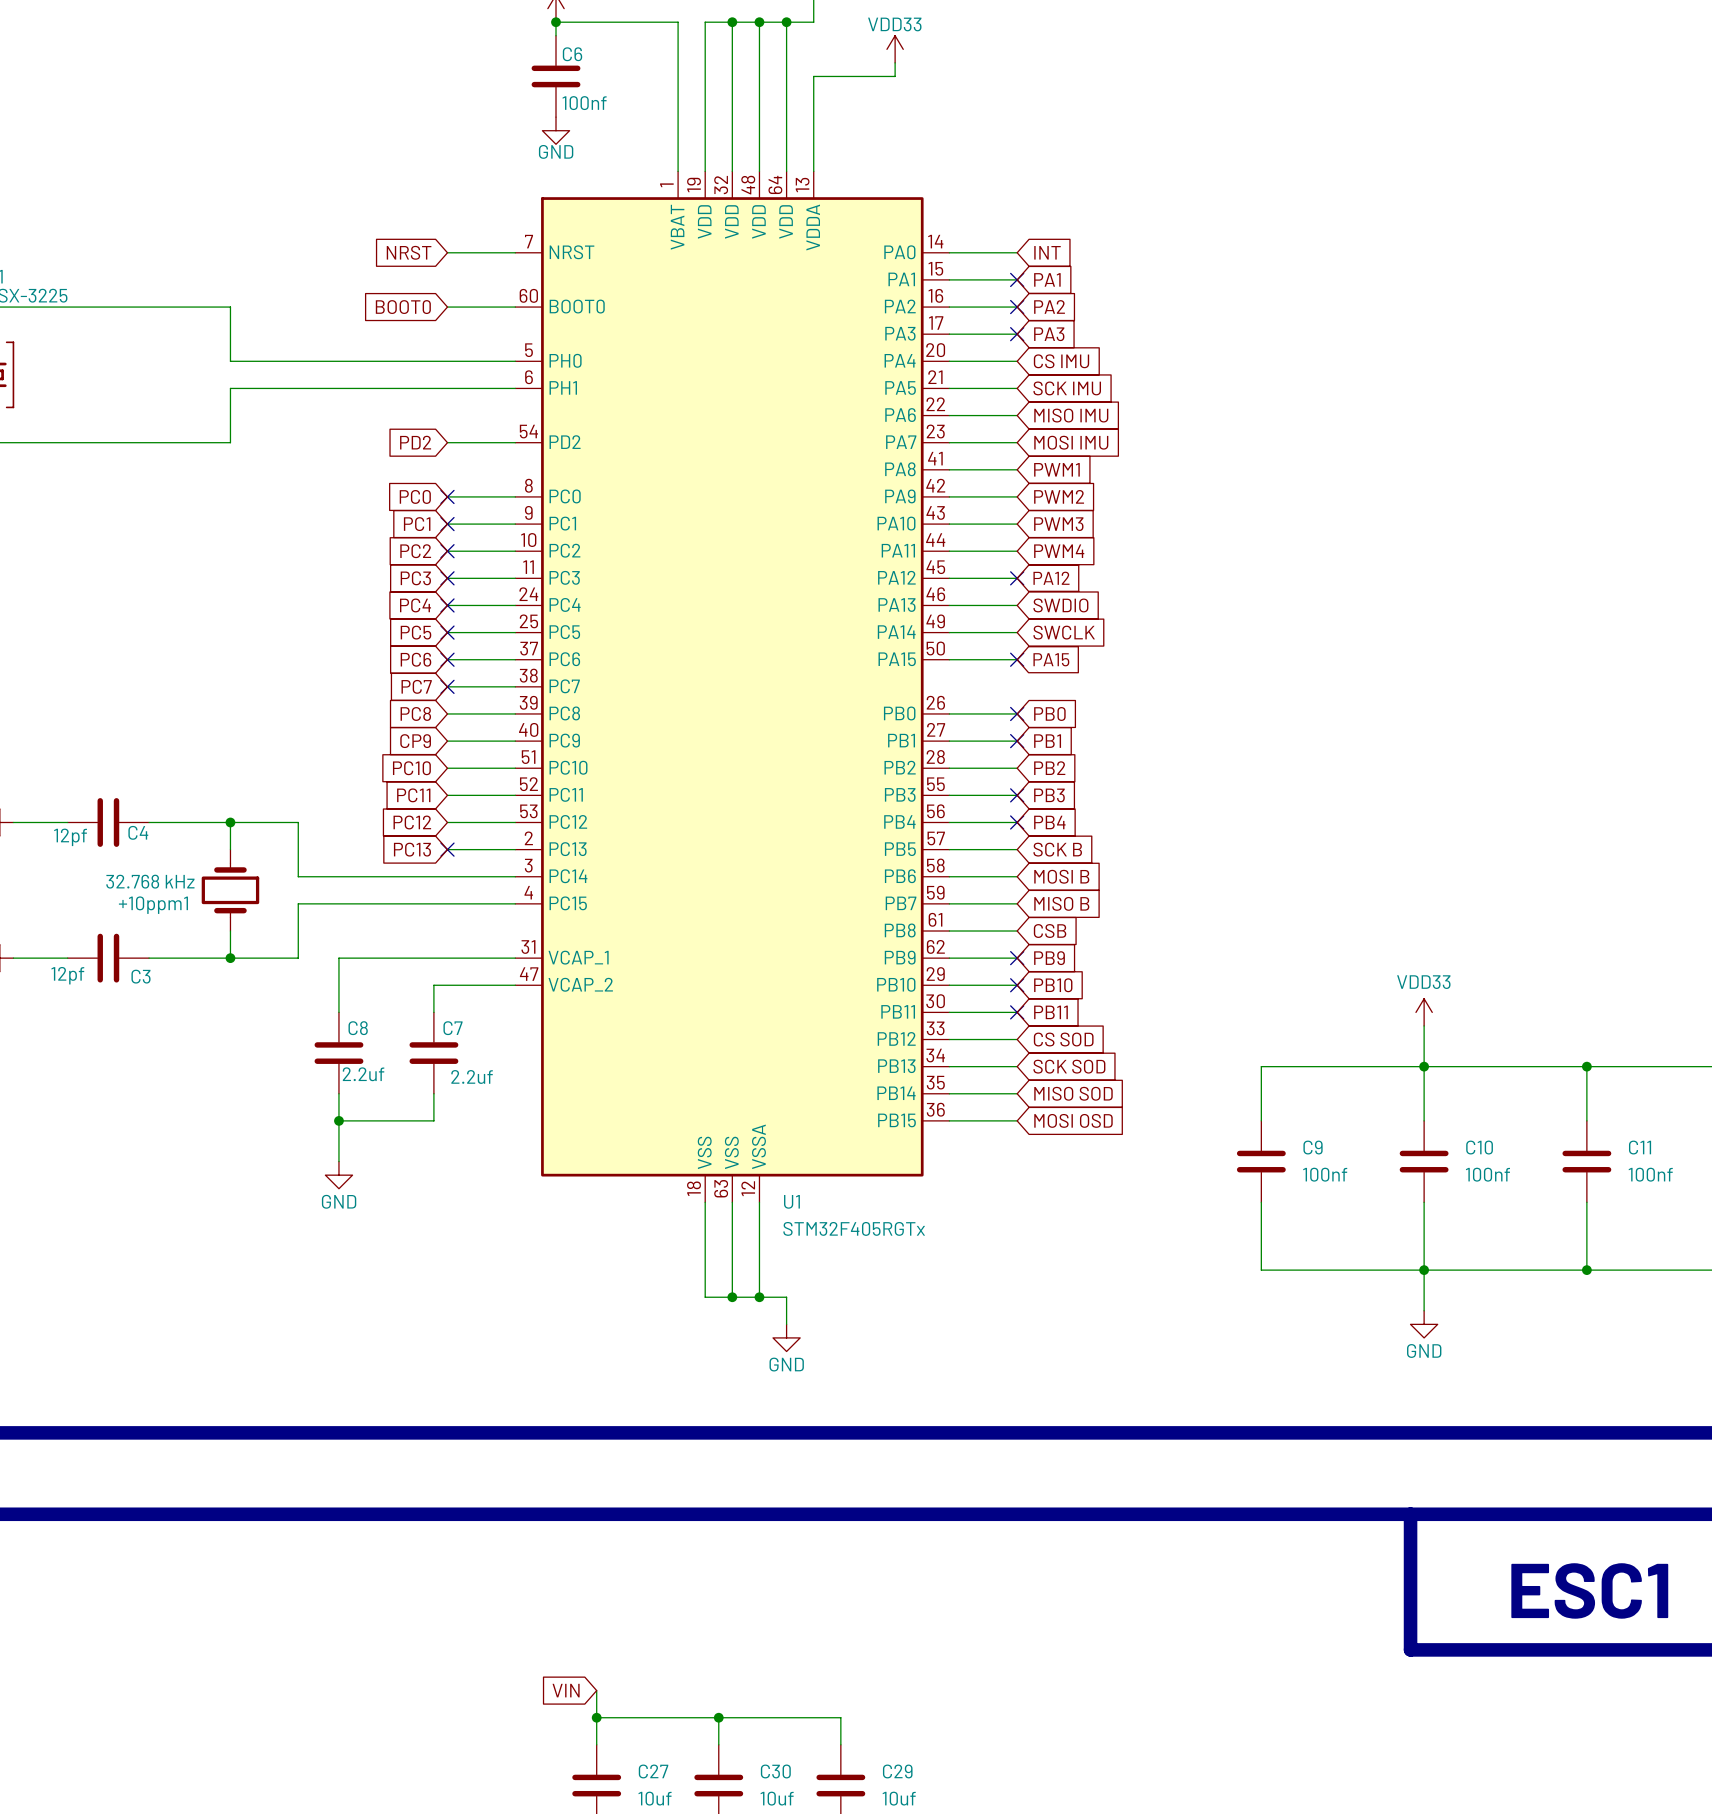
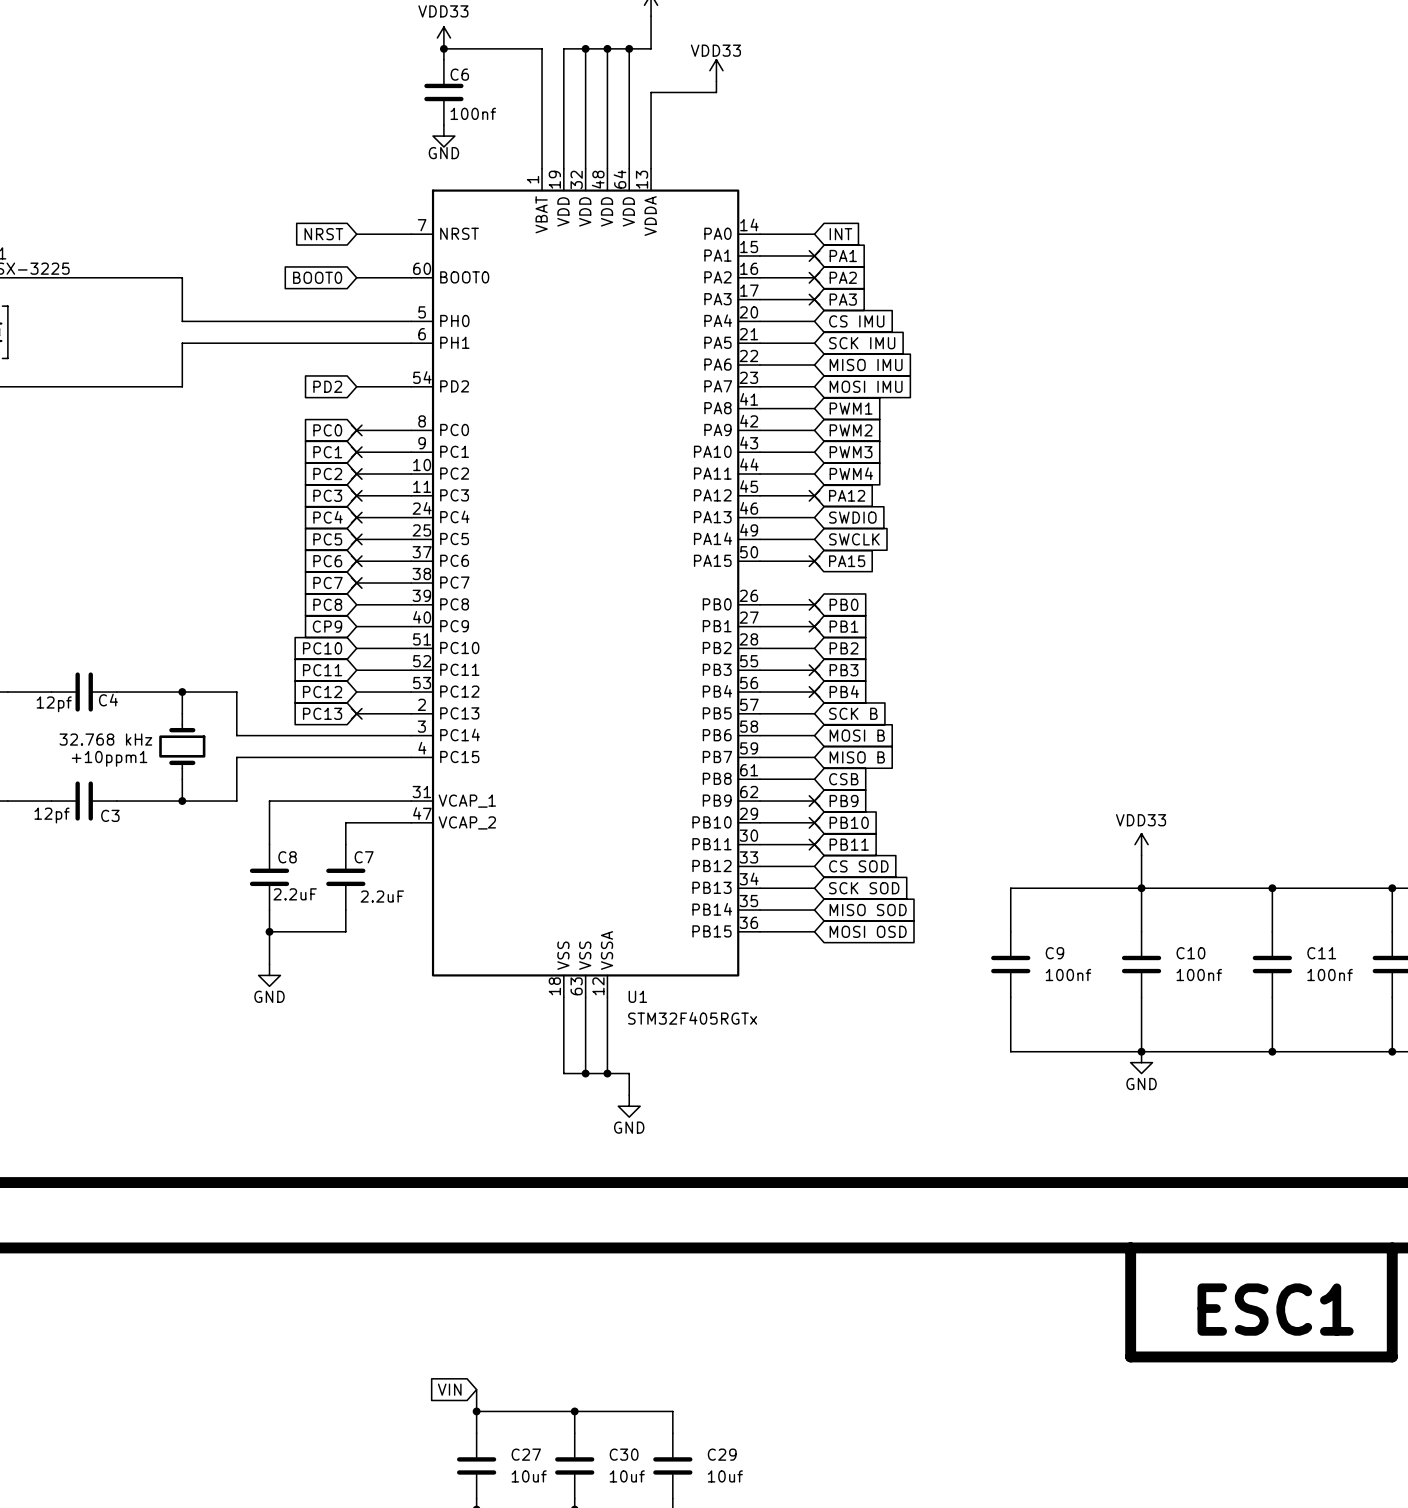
C8 value: 2.2uf (363, 1074) -> 2.2uF (295, 894)
C7 value: 2.2uf (472, 1076) -> 2.2uF (382, 896)
wire: (1424, 1270) (1424, 1310) -> none
power symbol position: GND (1424, 1324) -> GND (1141, 1062)

